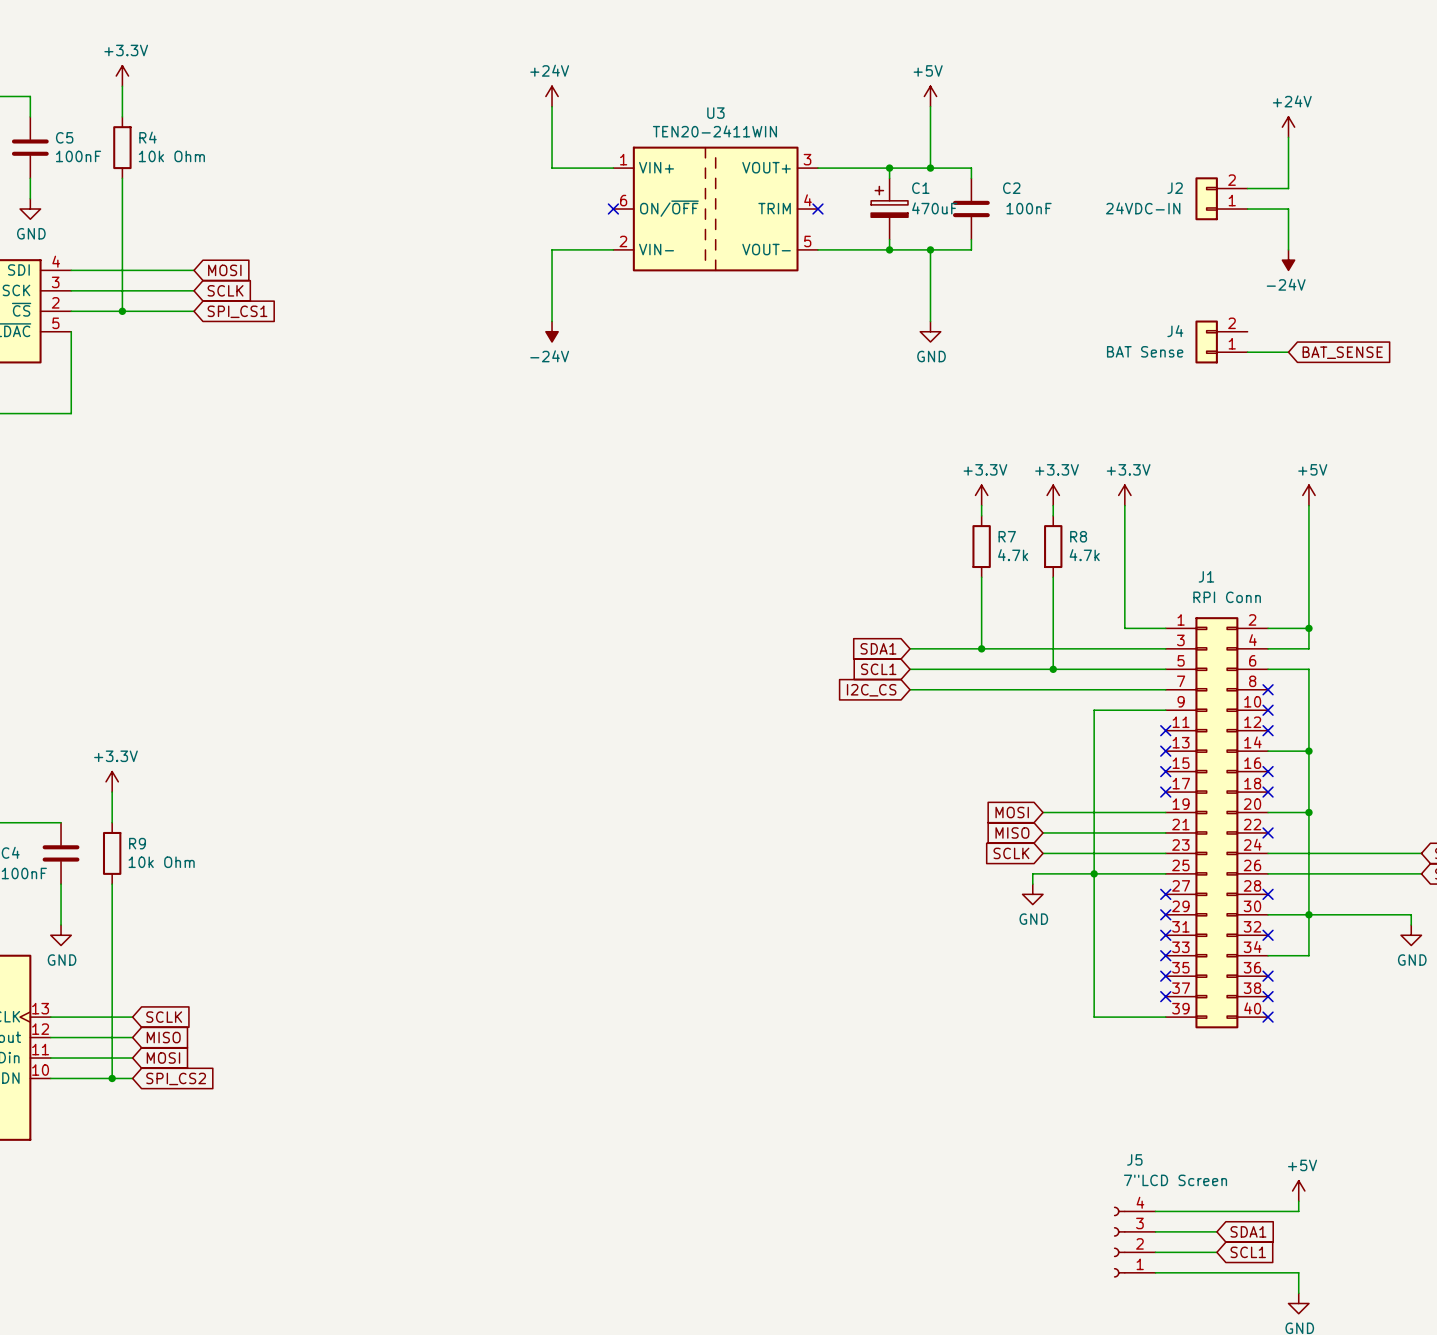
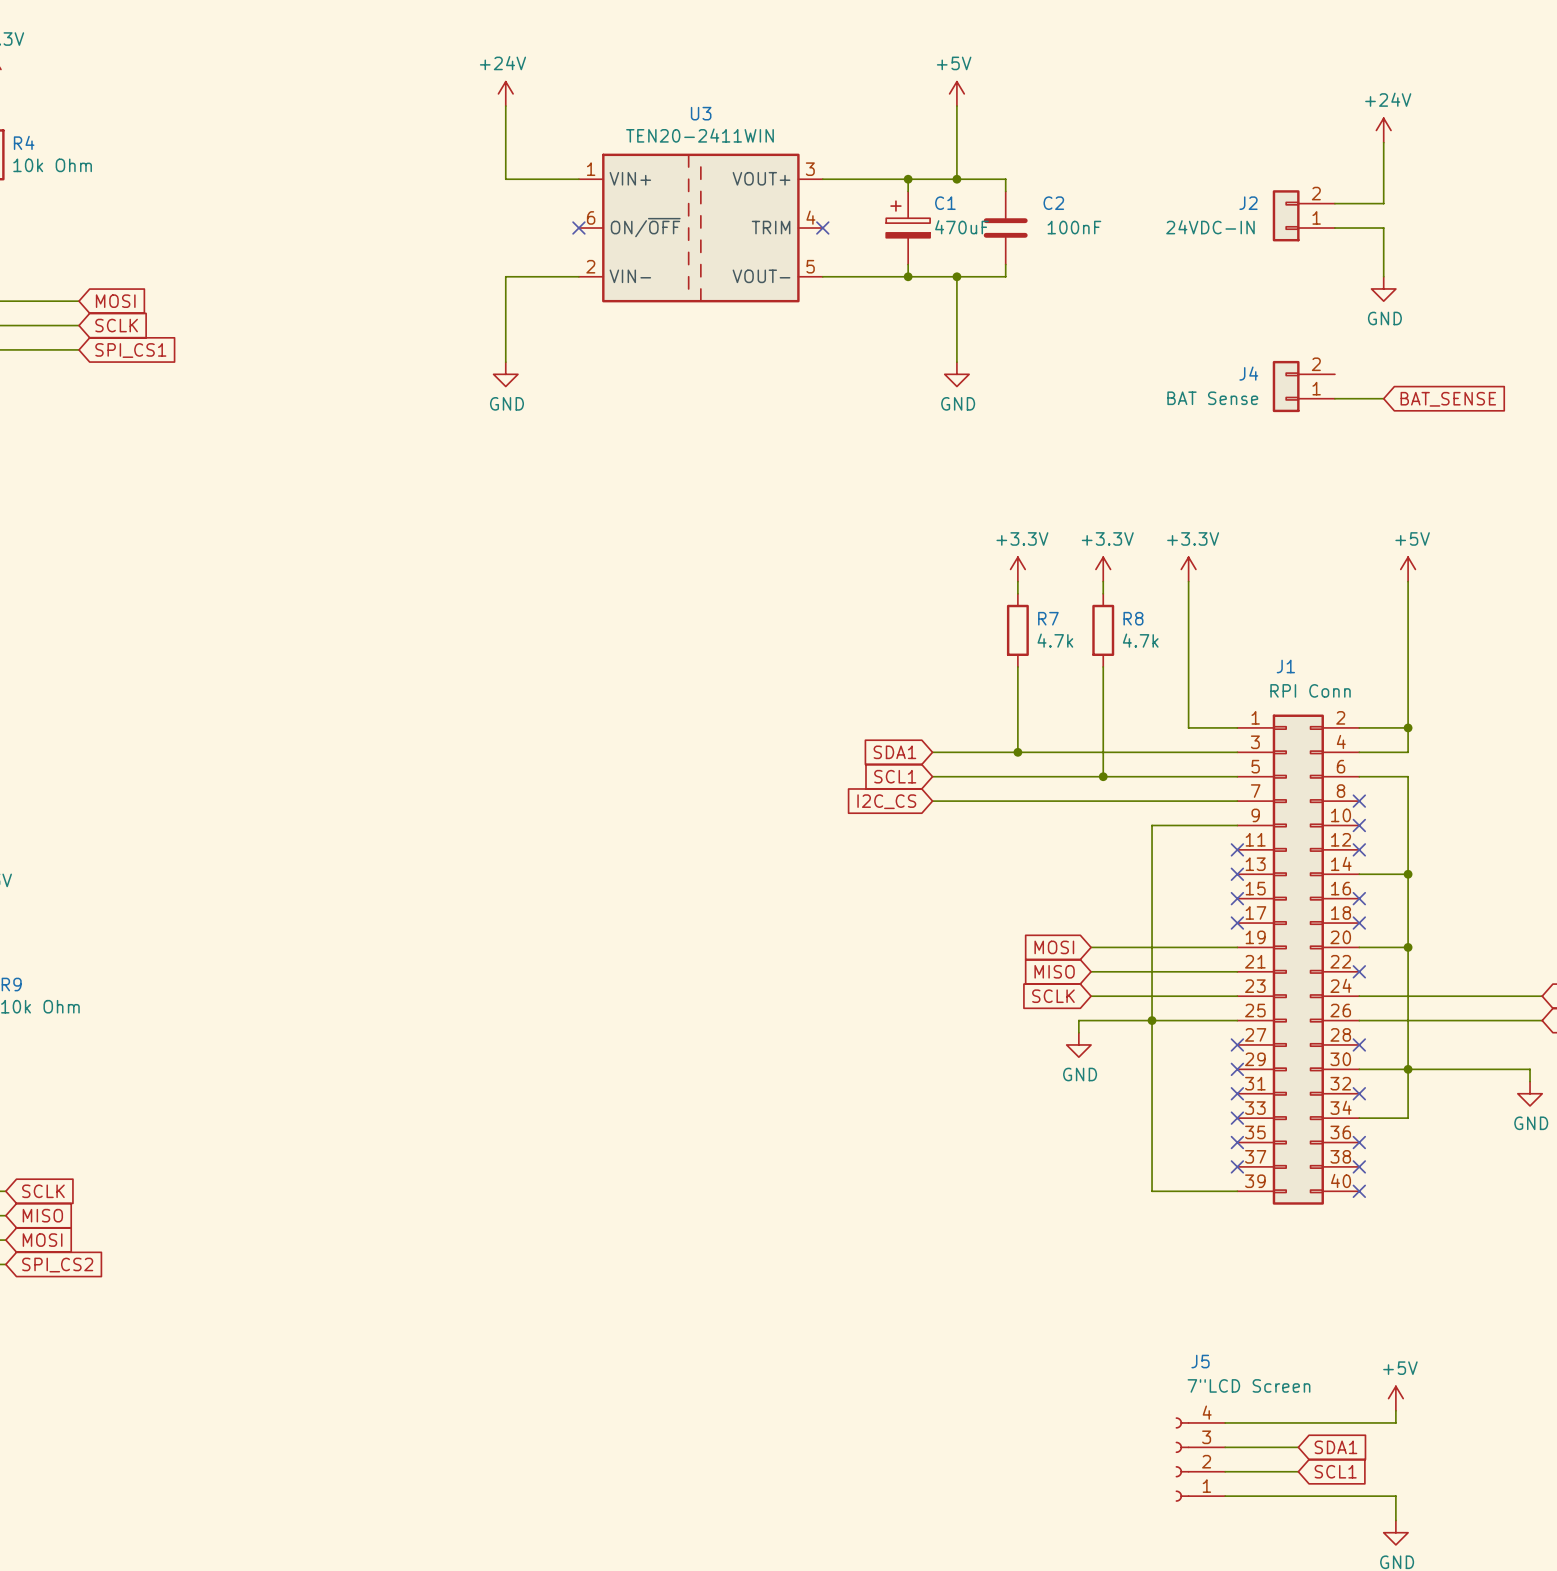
power symbol: -24V (1288, 260) -> GND (1383, 288)
power symbol: -24V (552, 331) -> GND (505, 374)

